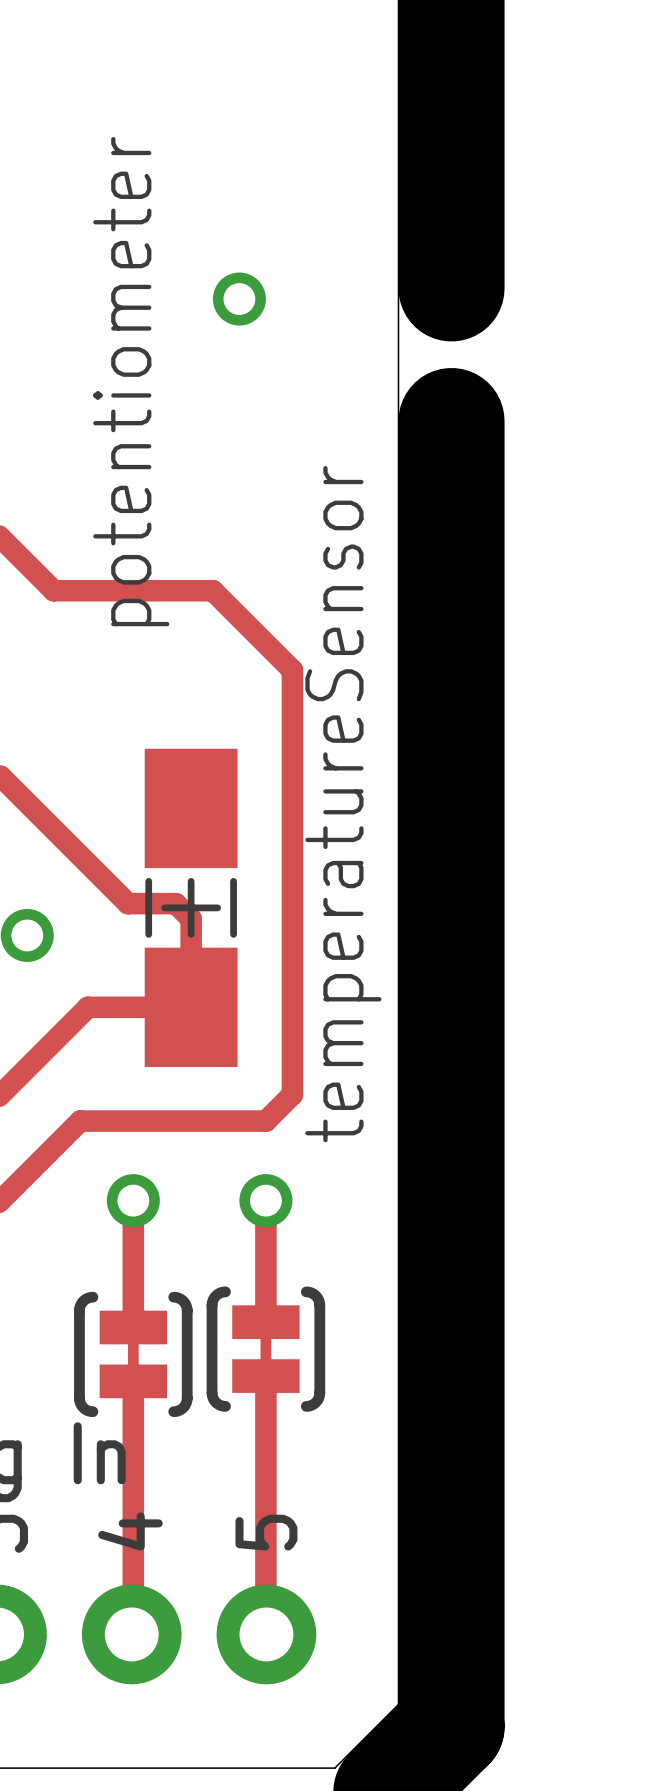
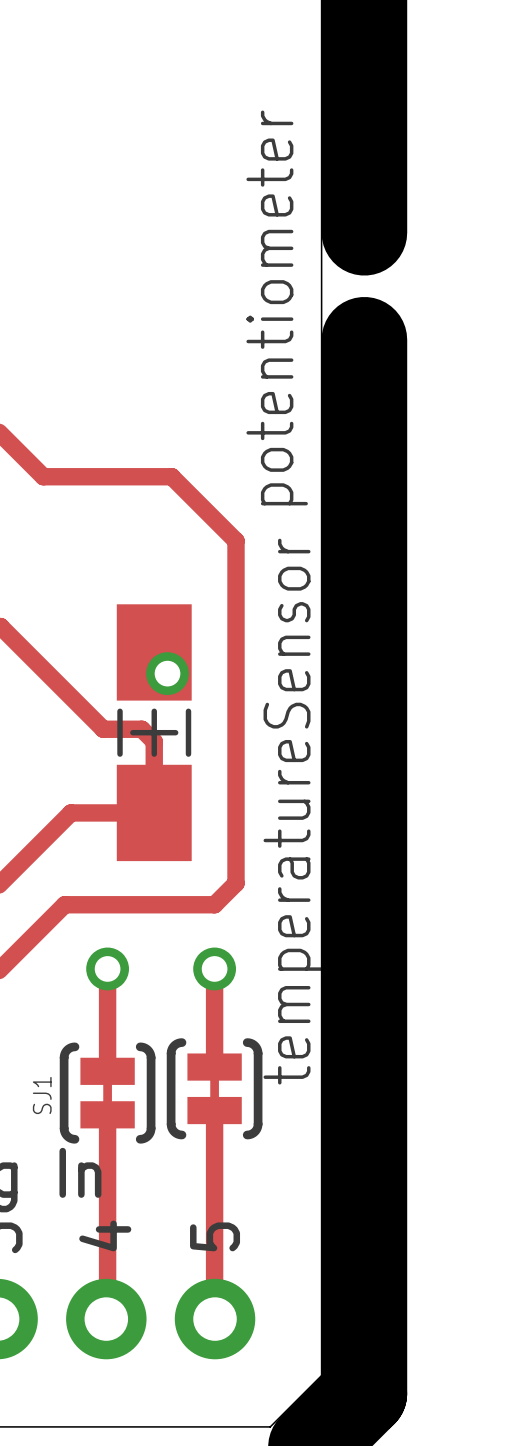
via: (239, 299) -> none
text position: potentiometer (131, 381) -> potentiometer (277, 307)
text position: temperatureSensor (343, 804) -> temperatureSensor (294, 811)
via: none -> (167, 673)
via: (27, 935) -> none
SJ1 name: none -> SJ1 (42, 1095)

